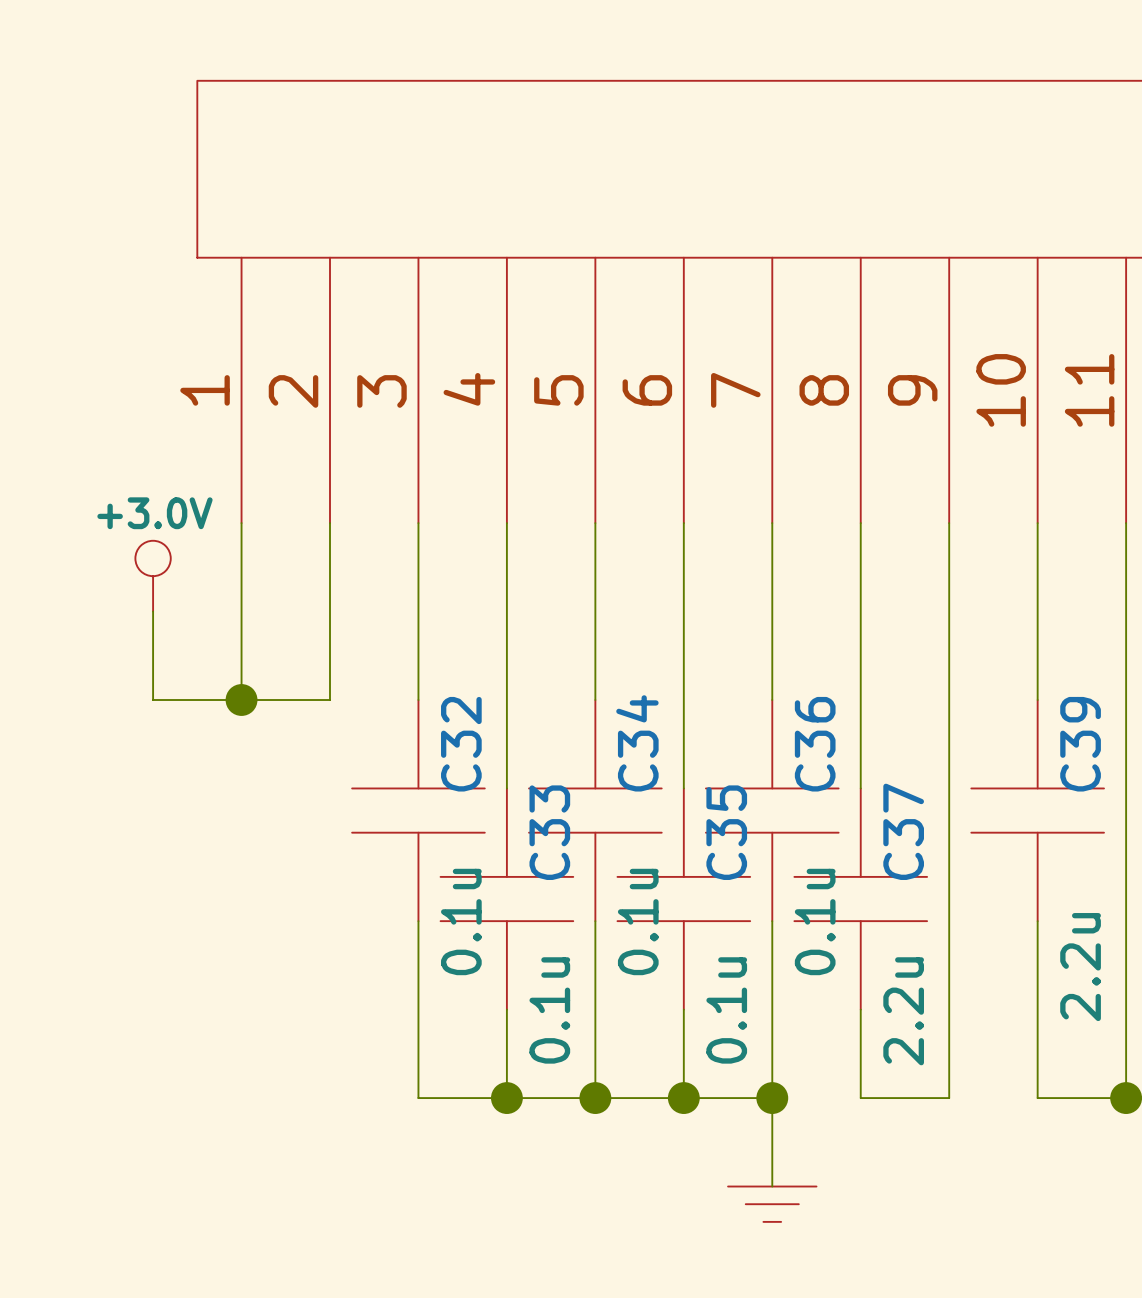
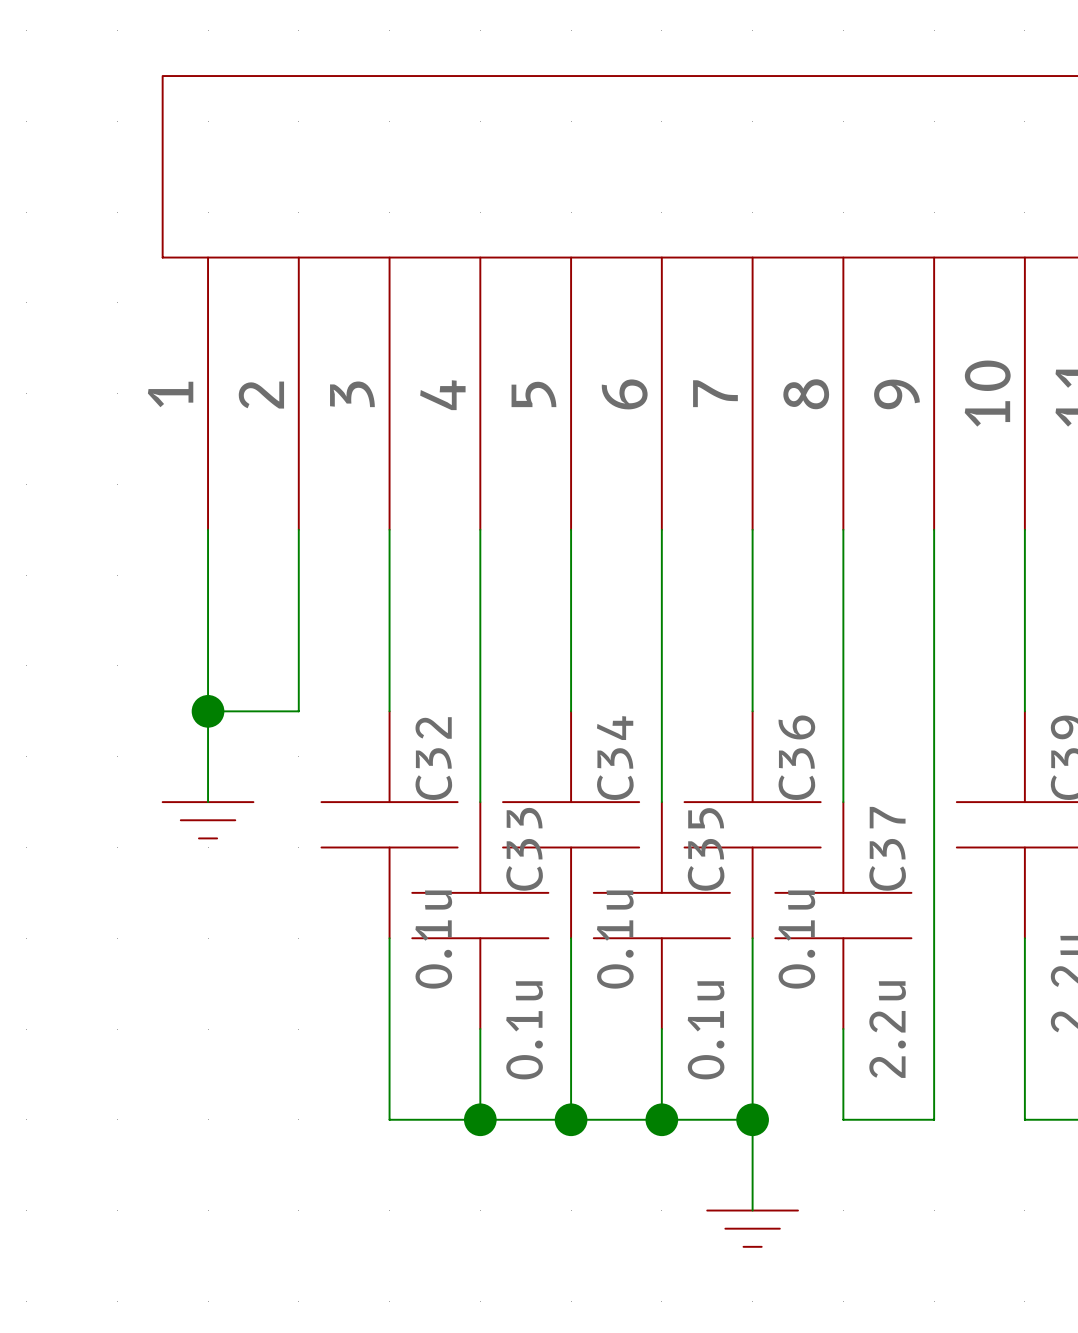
power symbol: +3.0V (153, 576) -> none
wire: (153, 611) (153, 700) (241, 700) -> (208, 802) (208, 711)
power symbol: none -> (208, 820)

